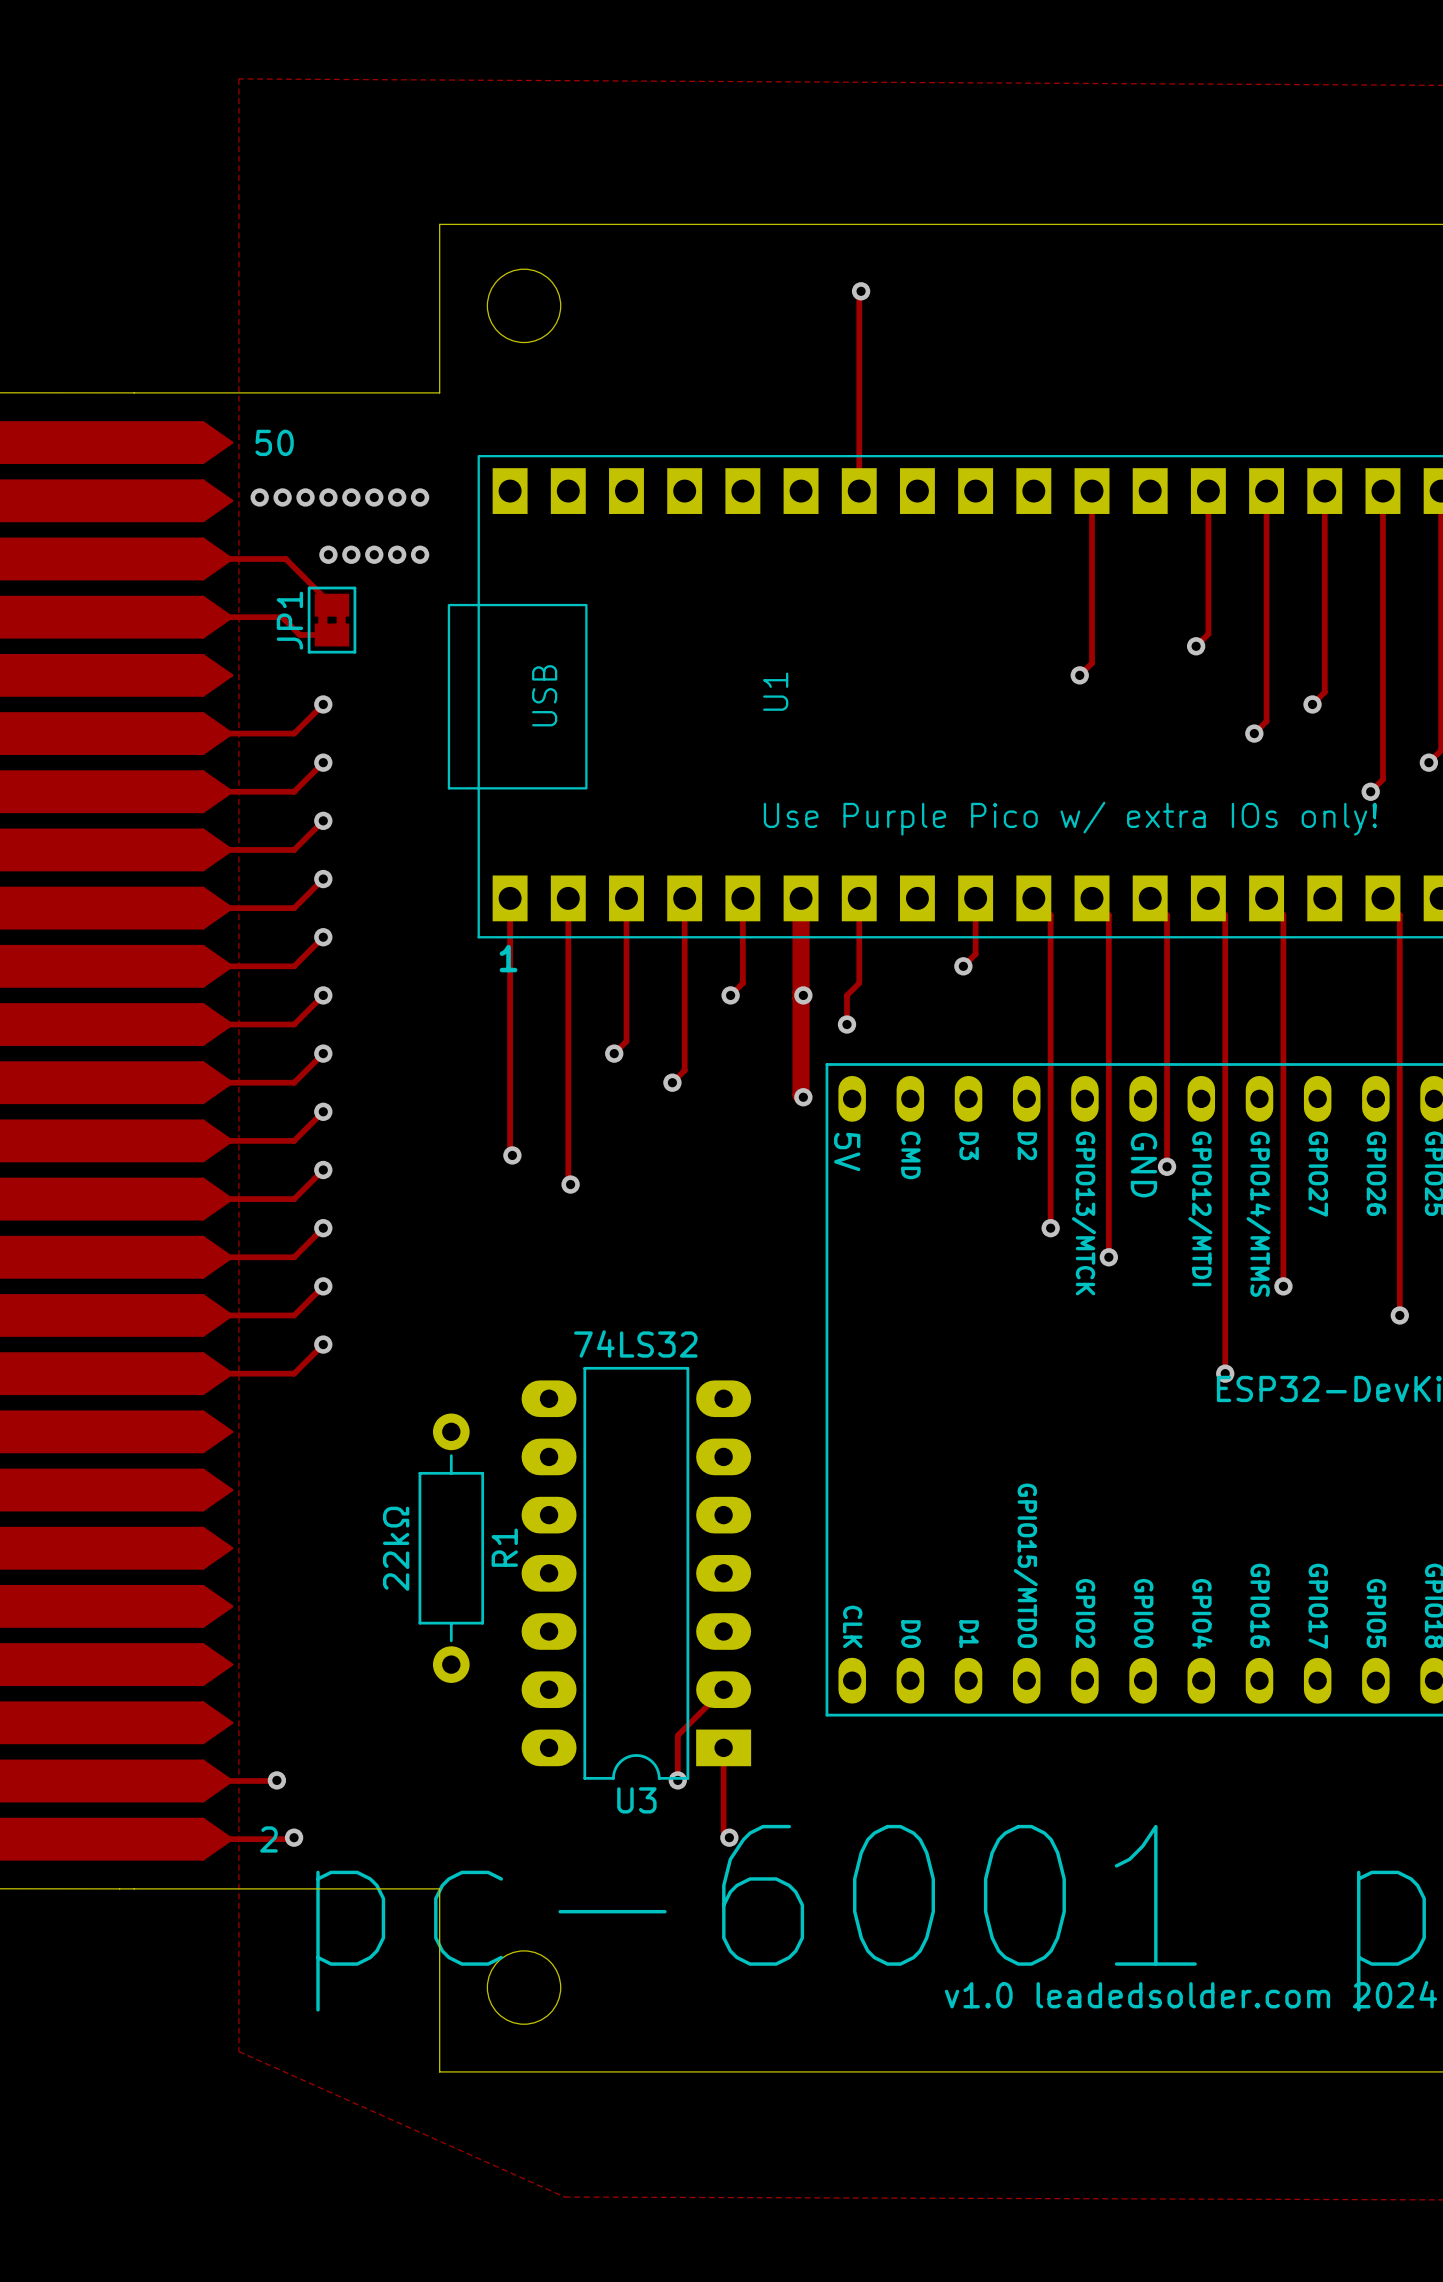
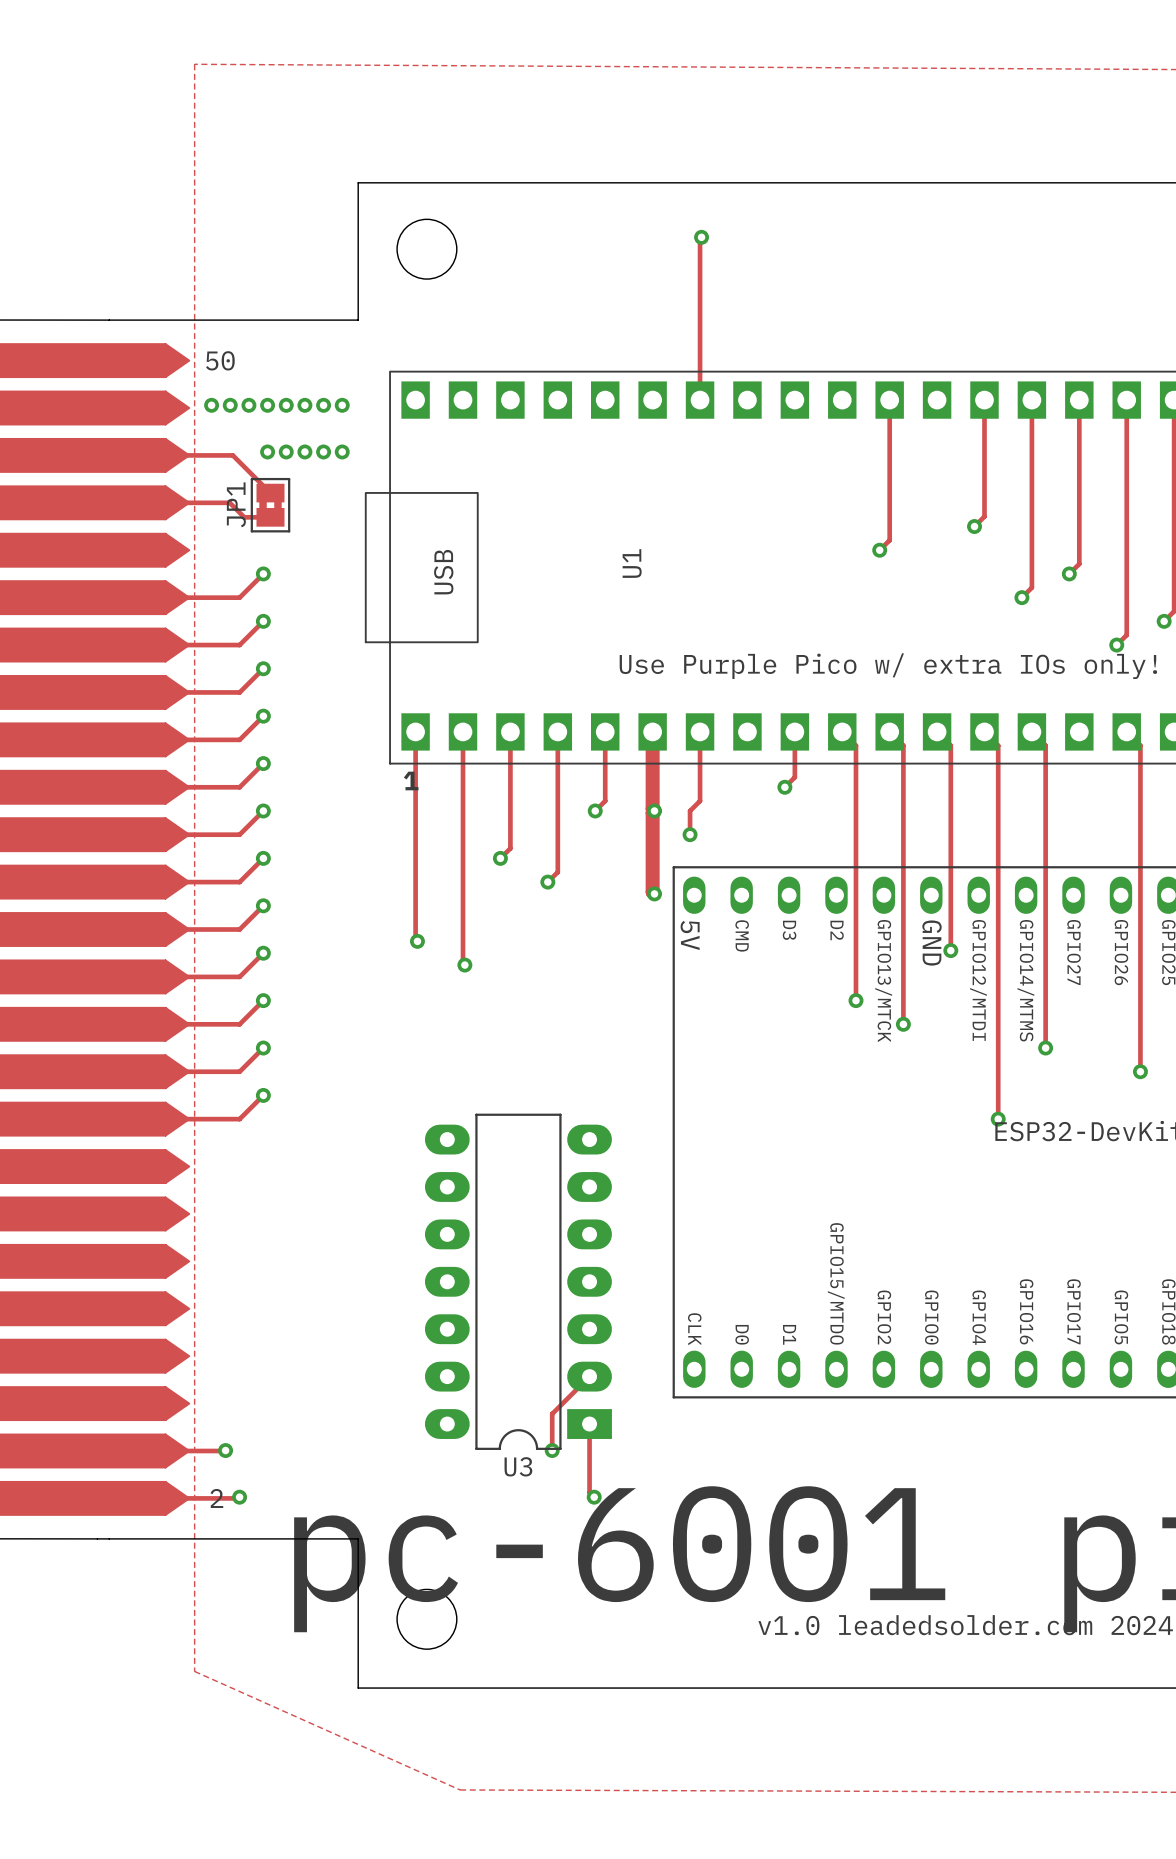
U3 value: 74LS32 (635, 1343) -> none
R1: 22kΩ (451, 1548) -> none

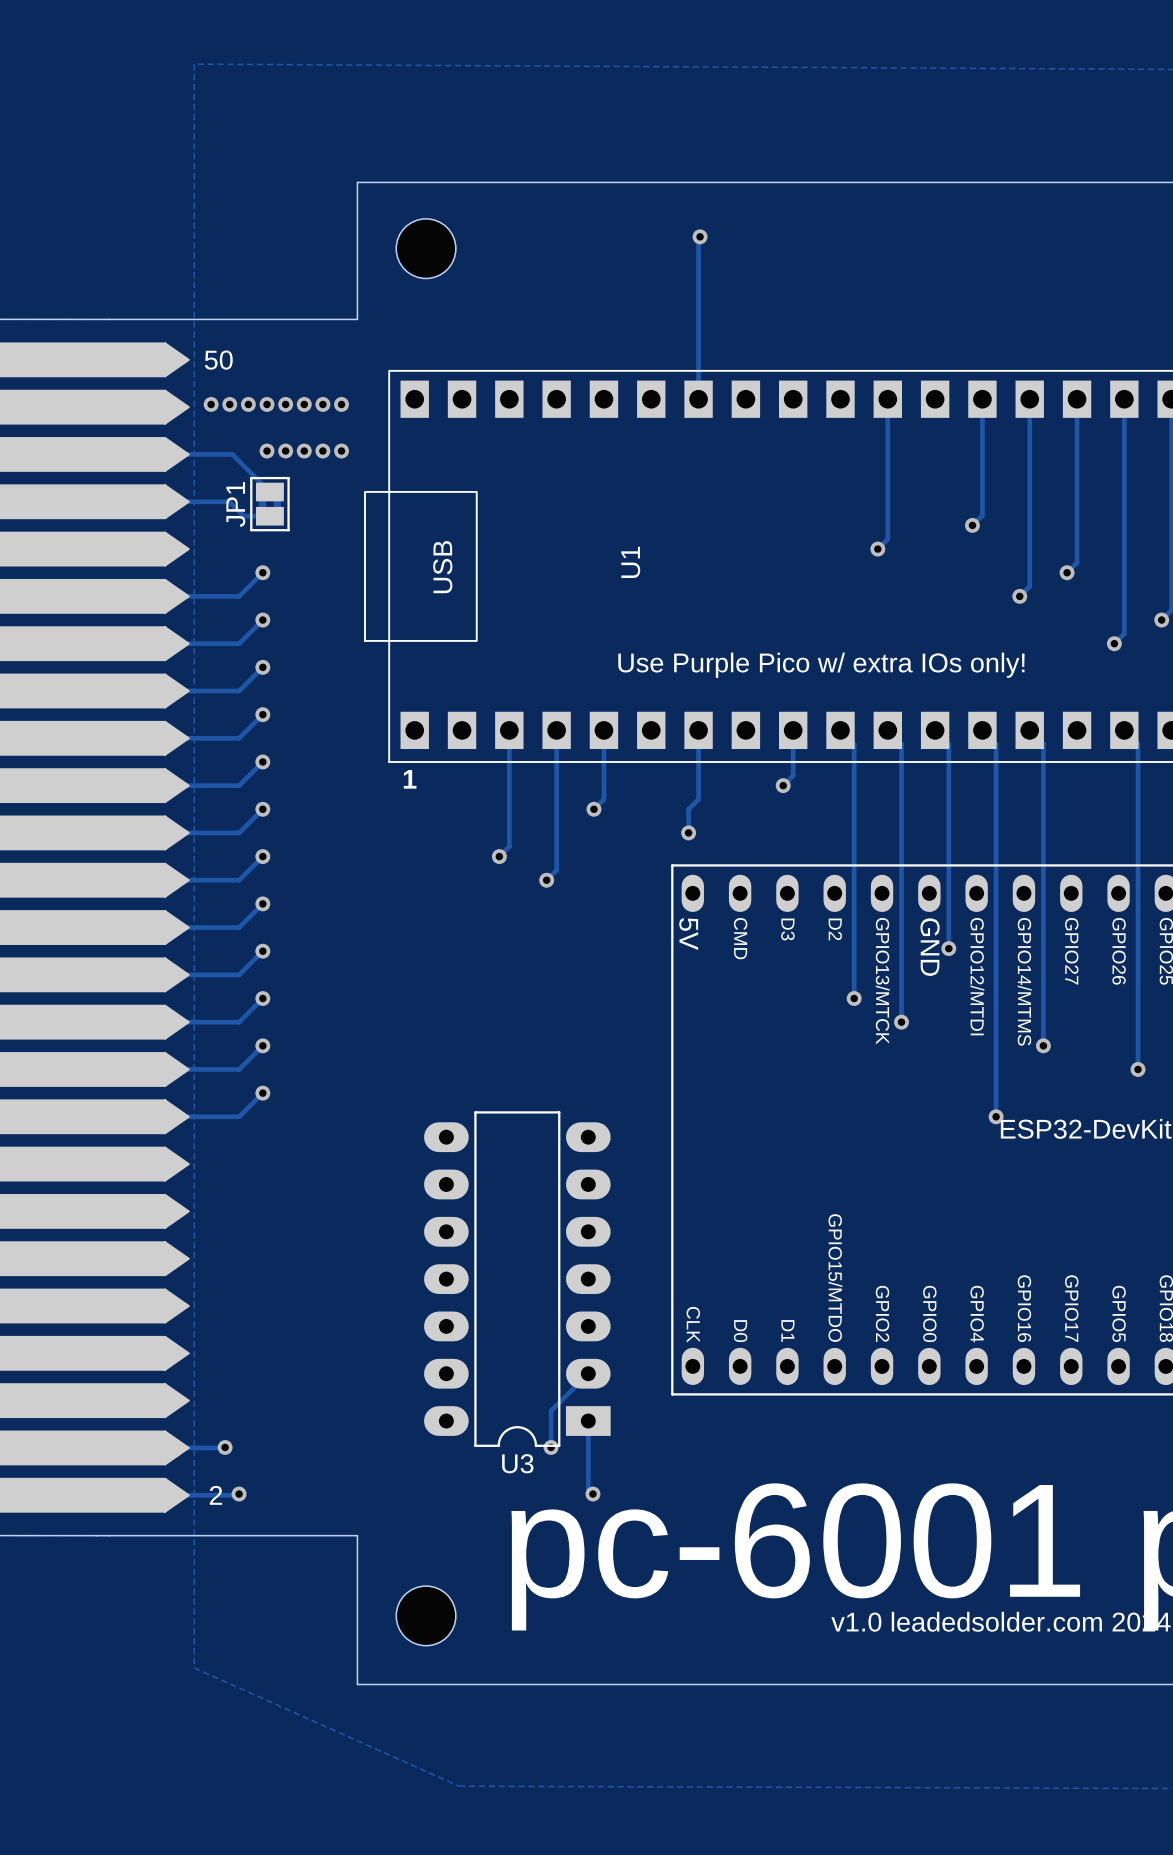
track: (415, 731) (415, 939) (417, 941) -> none
track: (463, 731) (463, 963) (464, 965) -> none
track: (652, 731) (652, 809) (654, 810) (652, 812) (652, 892) (654, 893) -> none
via: (654, 810) -> none
via: (654, 893) -> none
via: (417, 941) -> none
via: (464, 965) -> none

